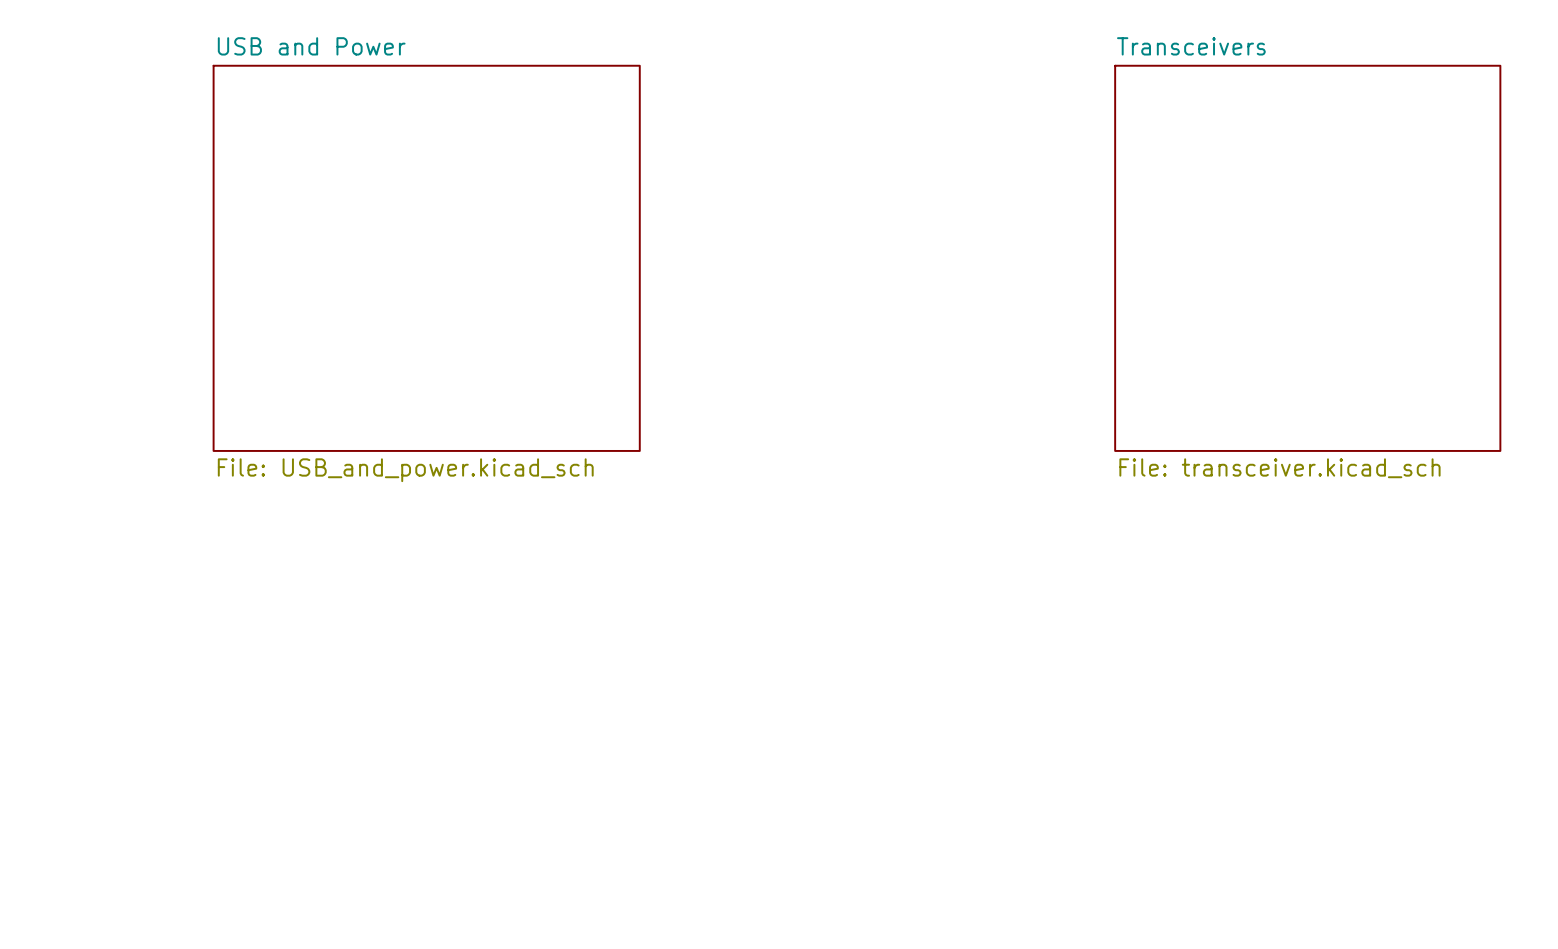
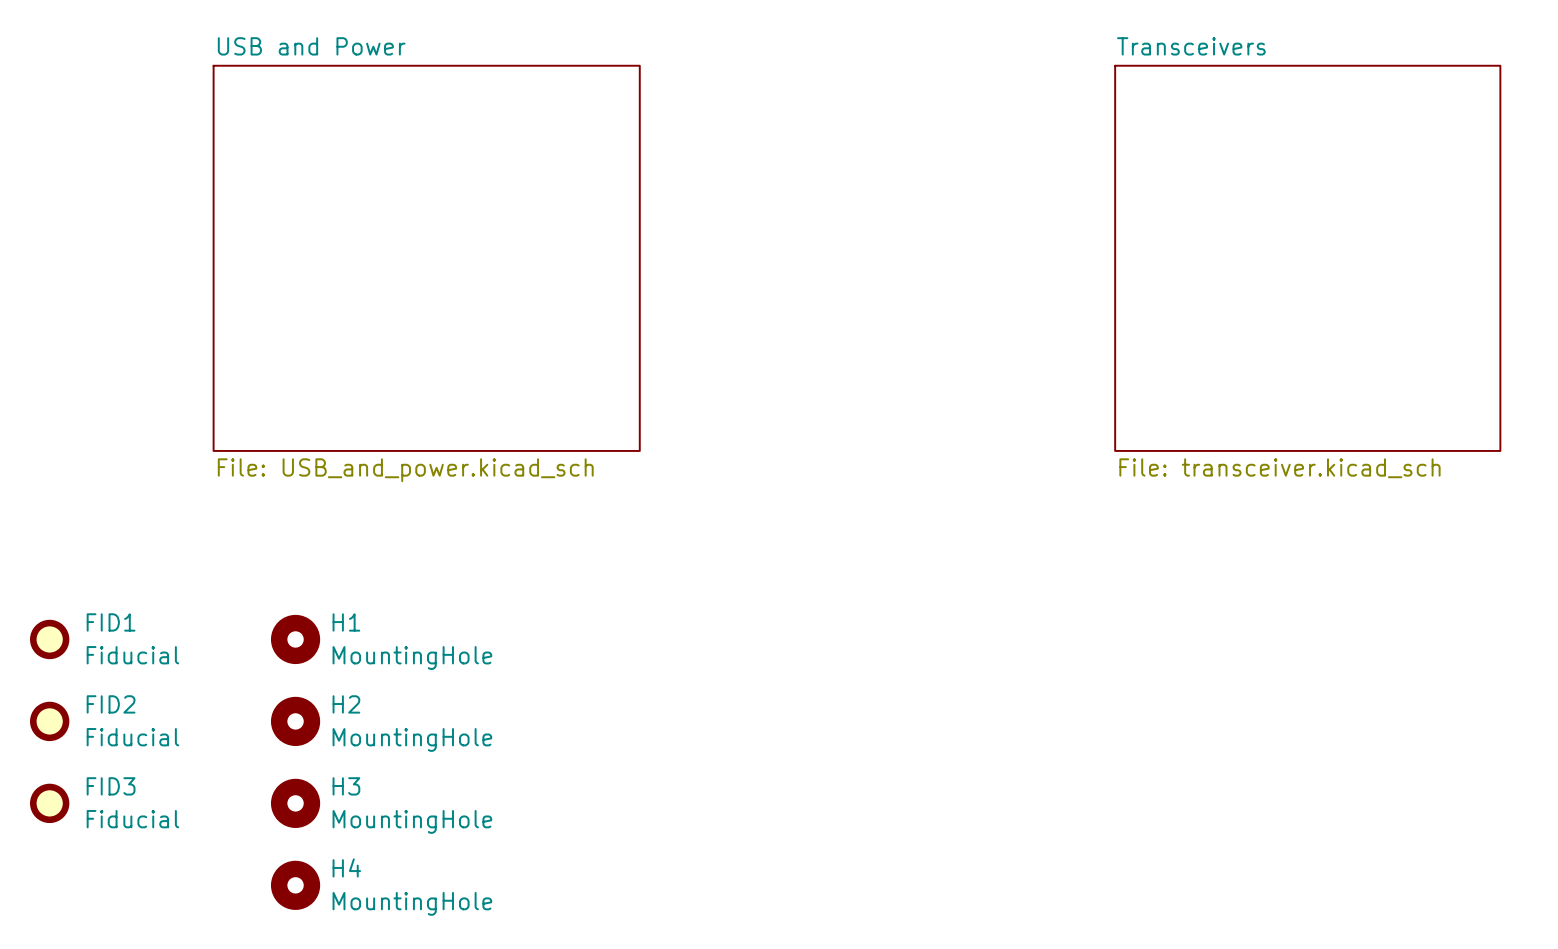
FID1: none -> Fiducial (49, 639)
H1: none -> MountingHole (295, 639)
FID2: none -> Fiducial (49, 721)
H2: none -> MountingHole (295, 721)
FID3: none -> Fiducial (49, 803)
H3: none -> MountingHole (295, 803)
H4: none -> MountingHole (295, 885)

